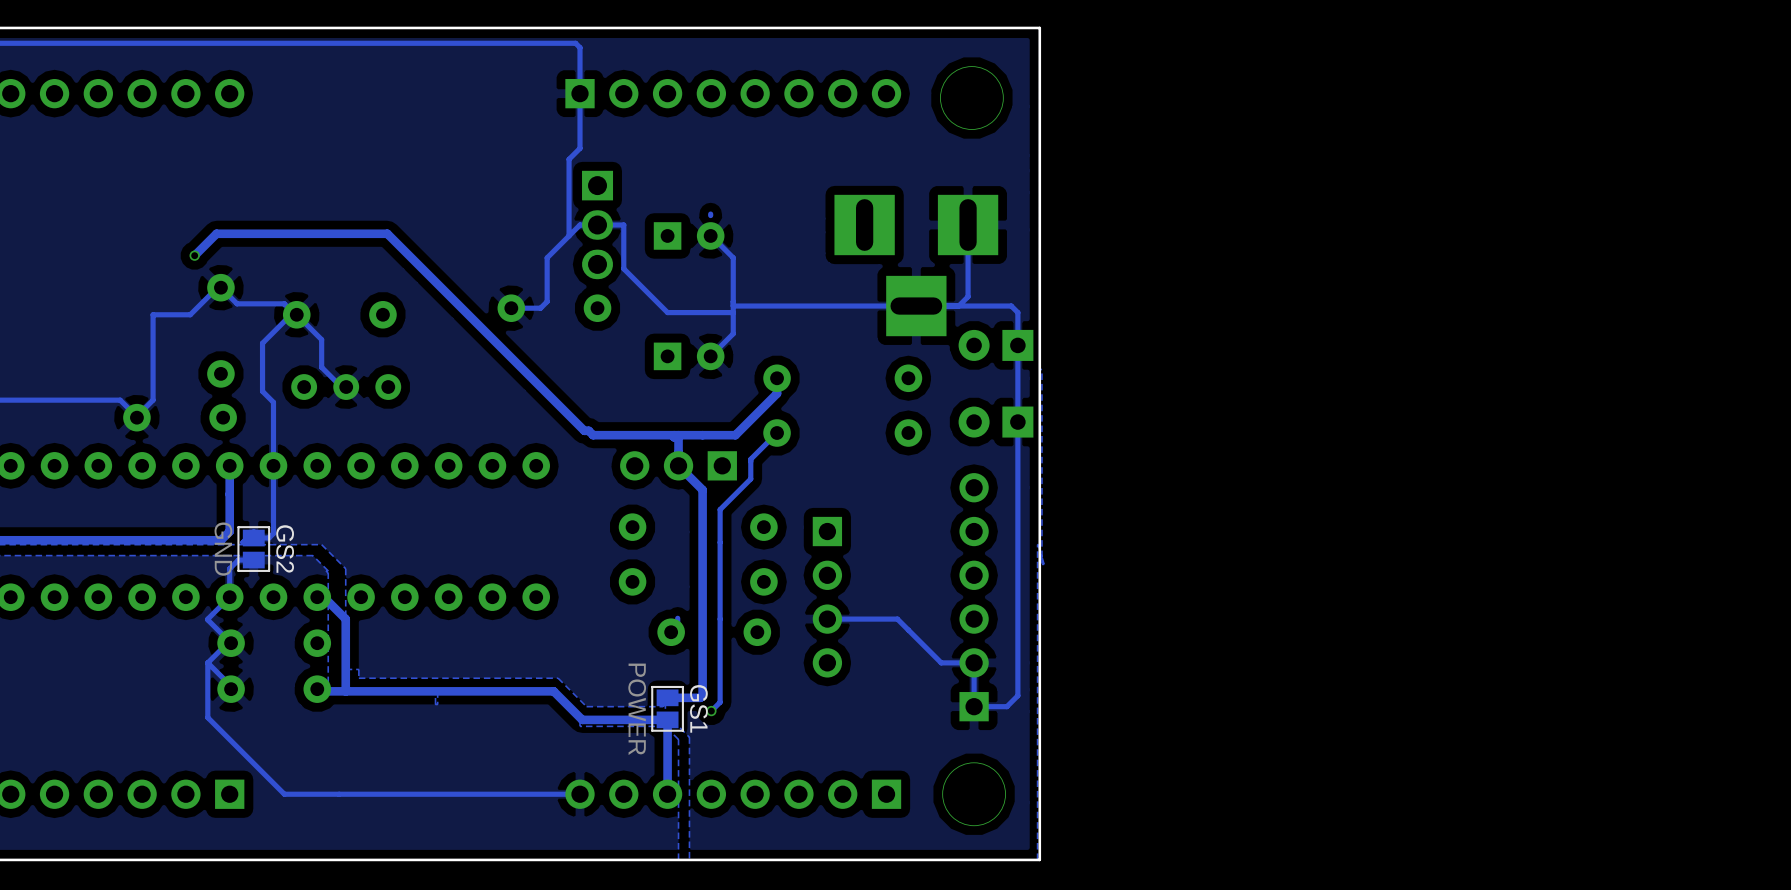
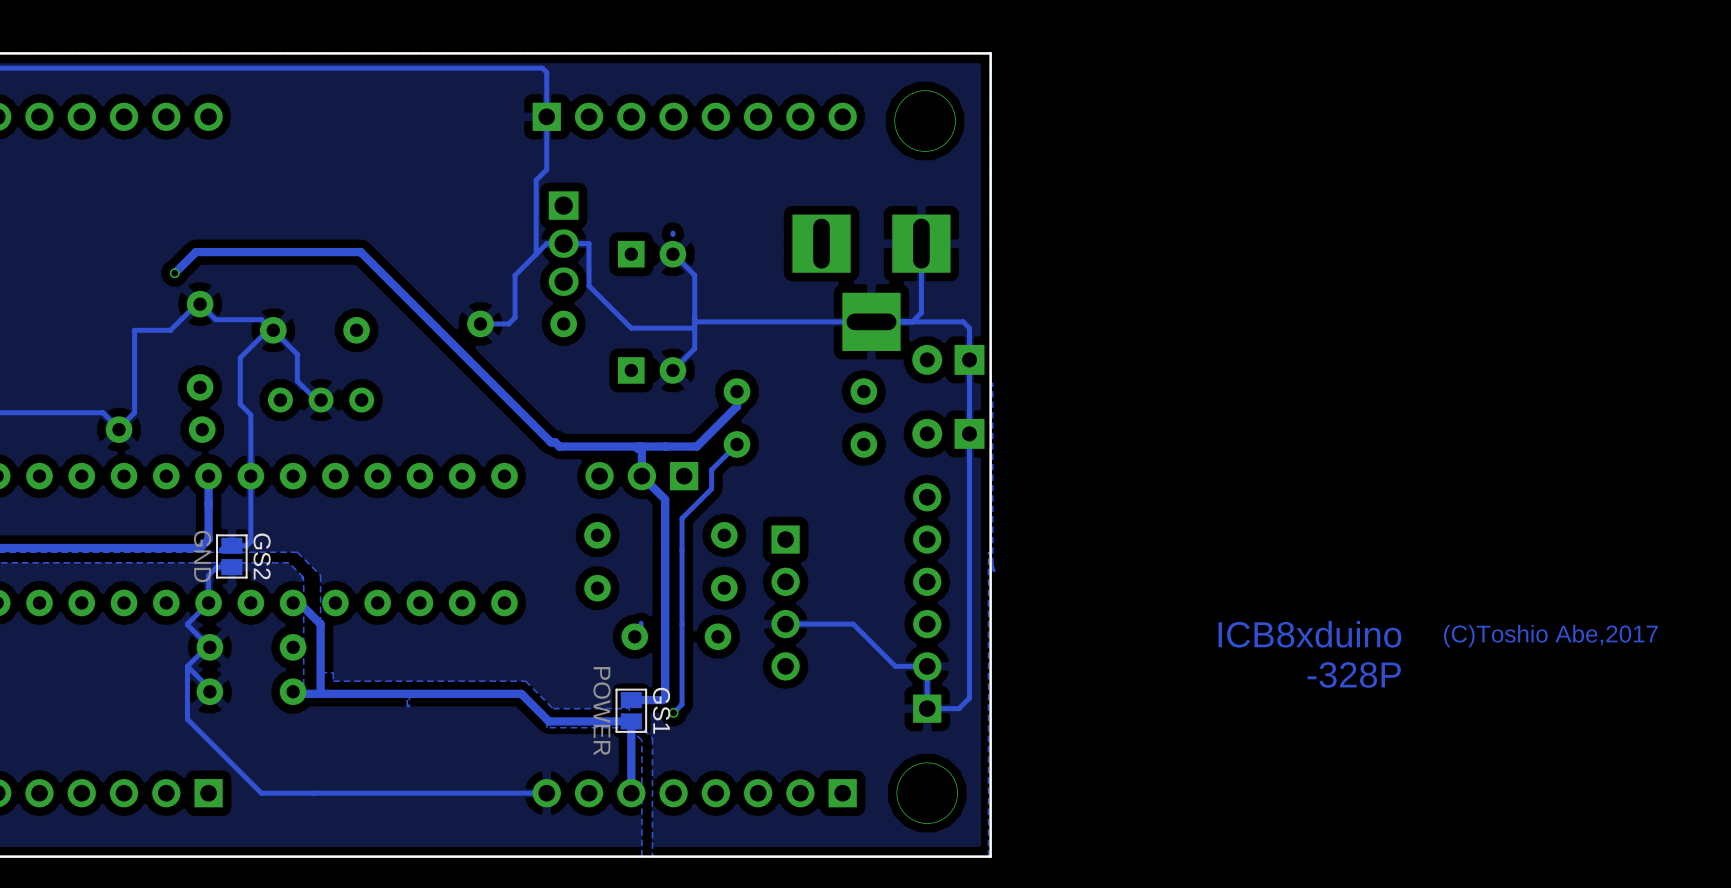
text: none -> ICB8xduino (1309, 634)
text: none -> (C)Toshio Abe,2017 (1550, 636)
text: none -> -328P (1354, 674)

